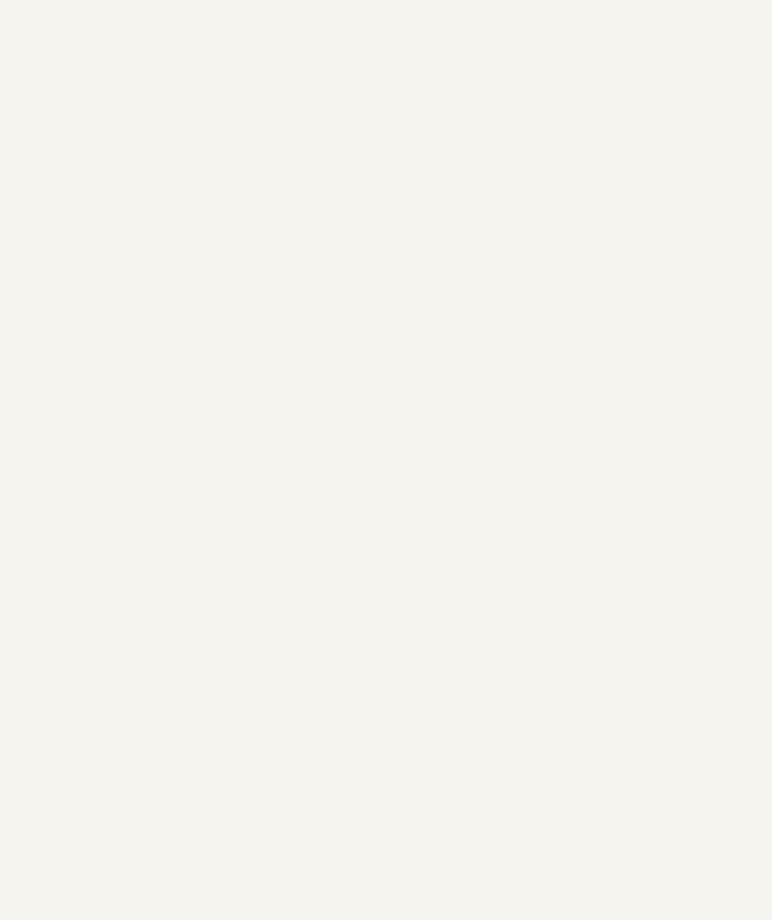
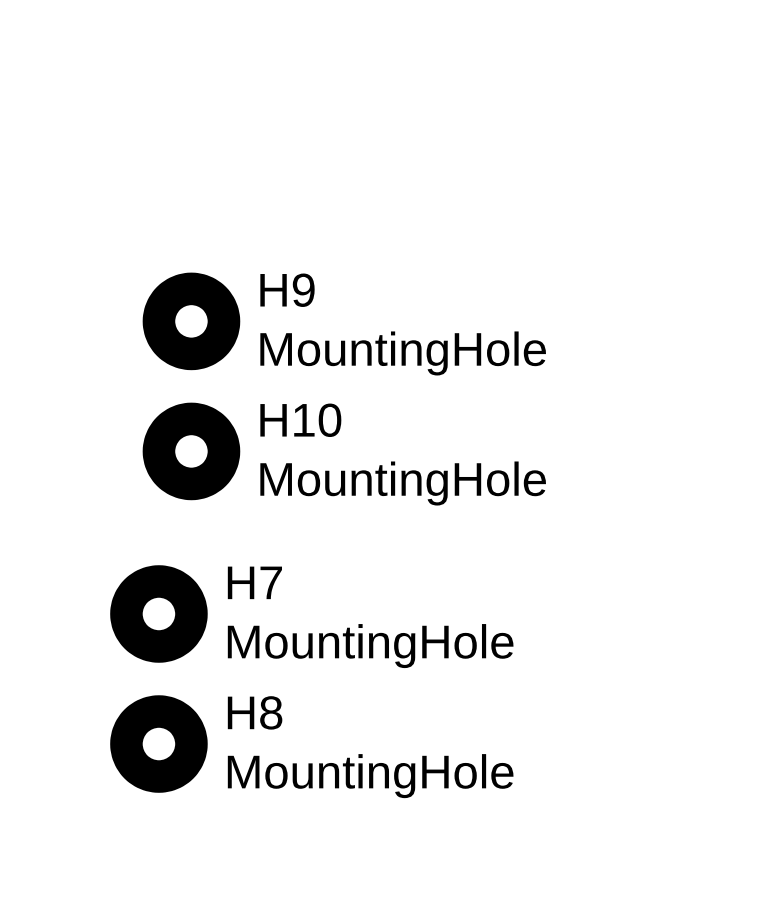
H9: none -> MountingHole (191, 321)
H10: none -> MountingHole (191, 451)
H7: none -> MountingHole (158, 613)
H8: none -> MountingHole (158, 744)

